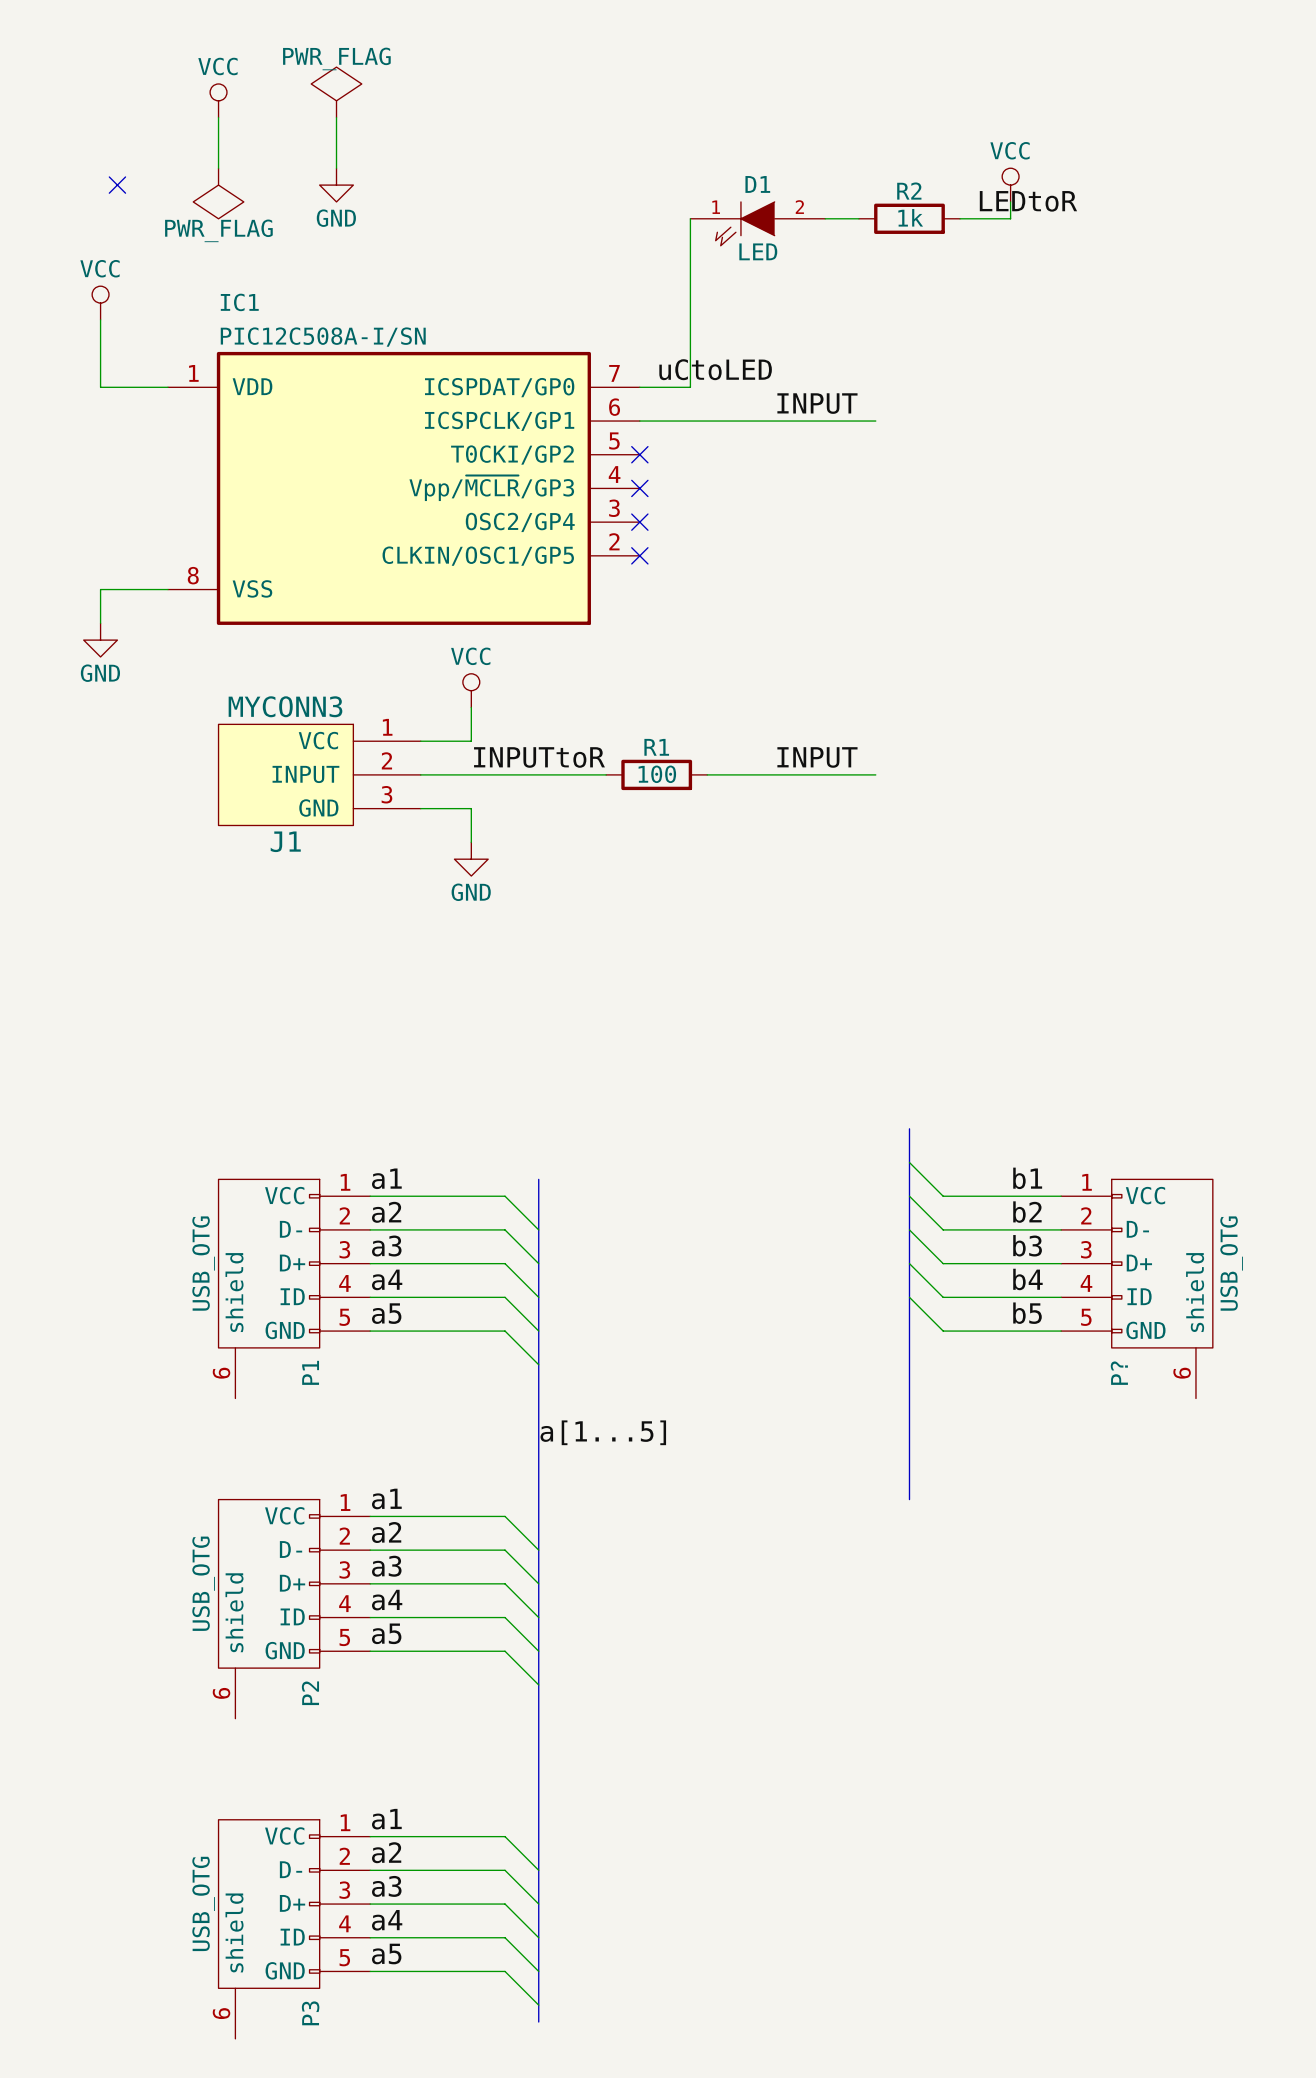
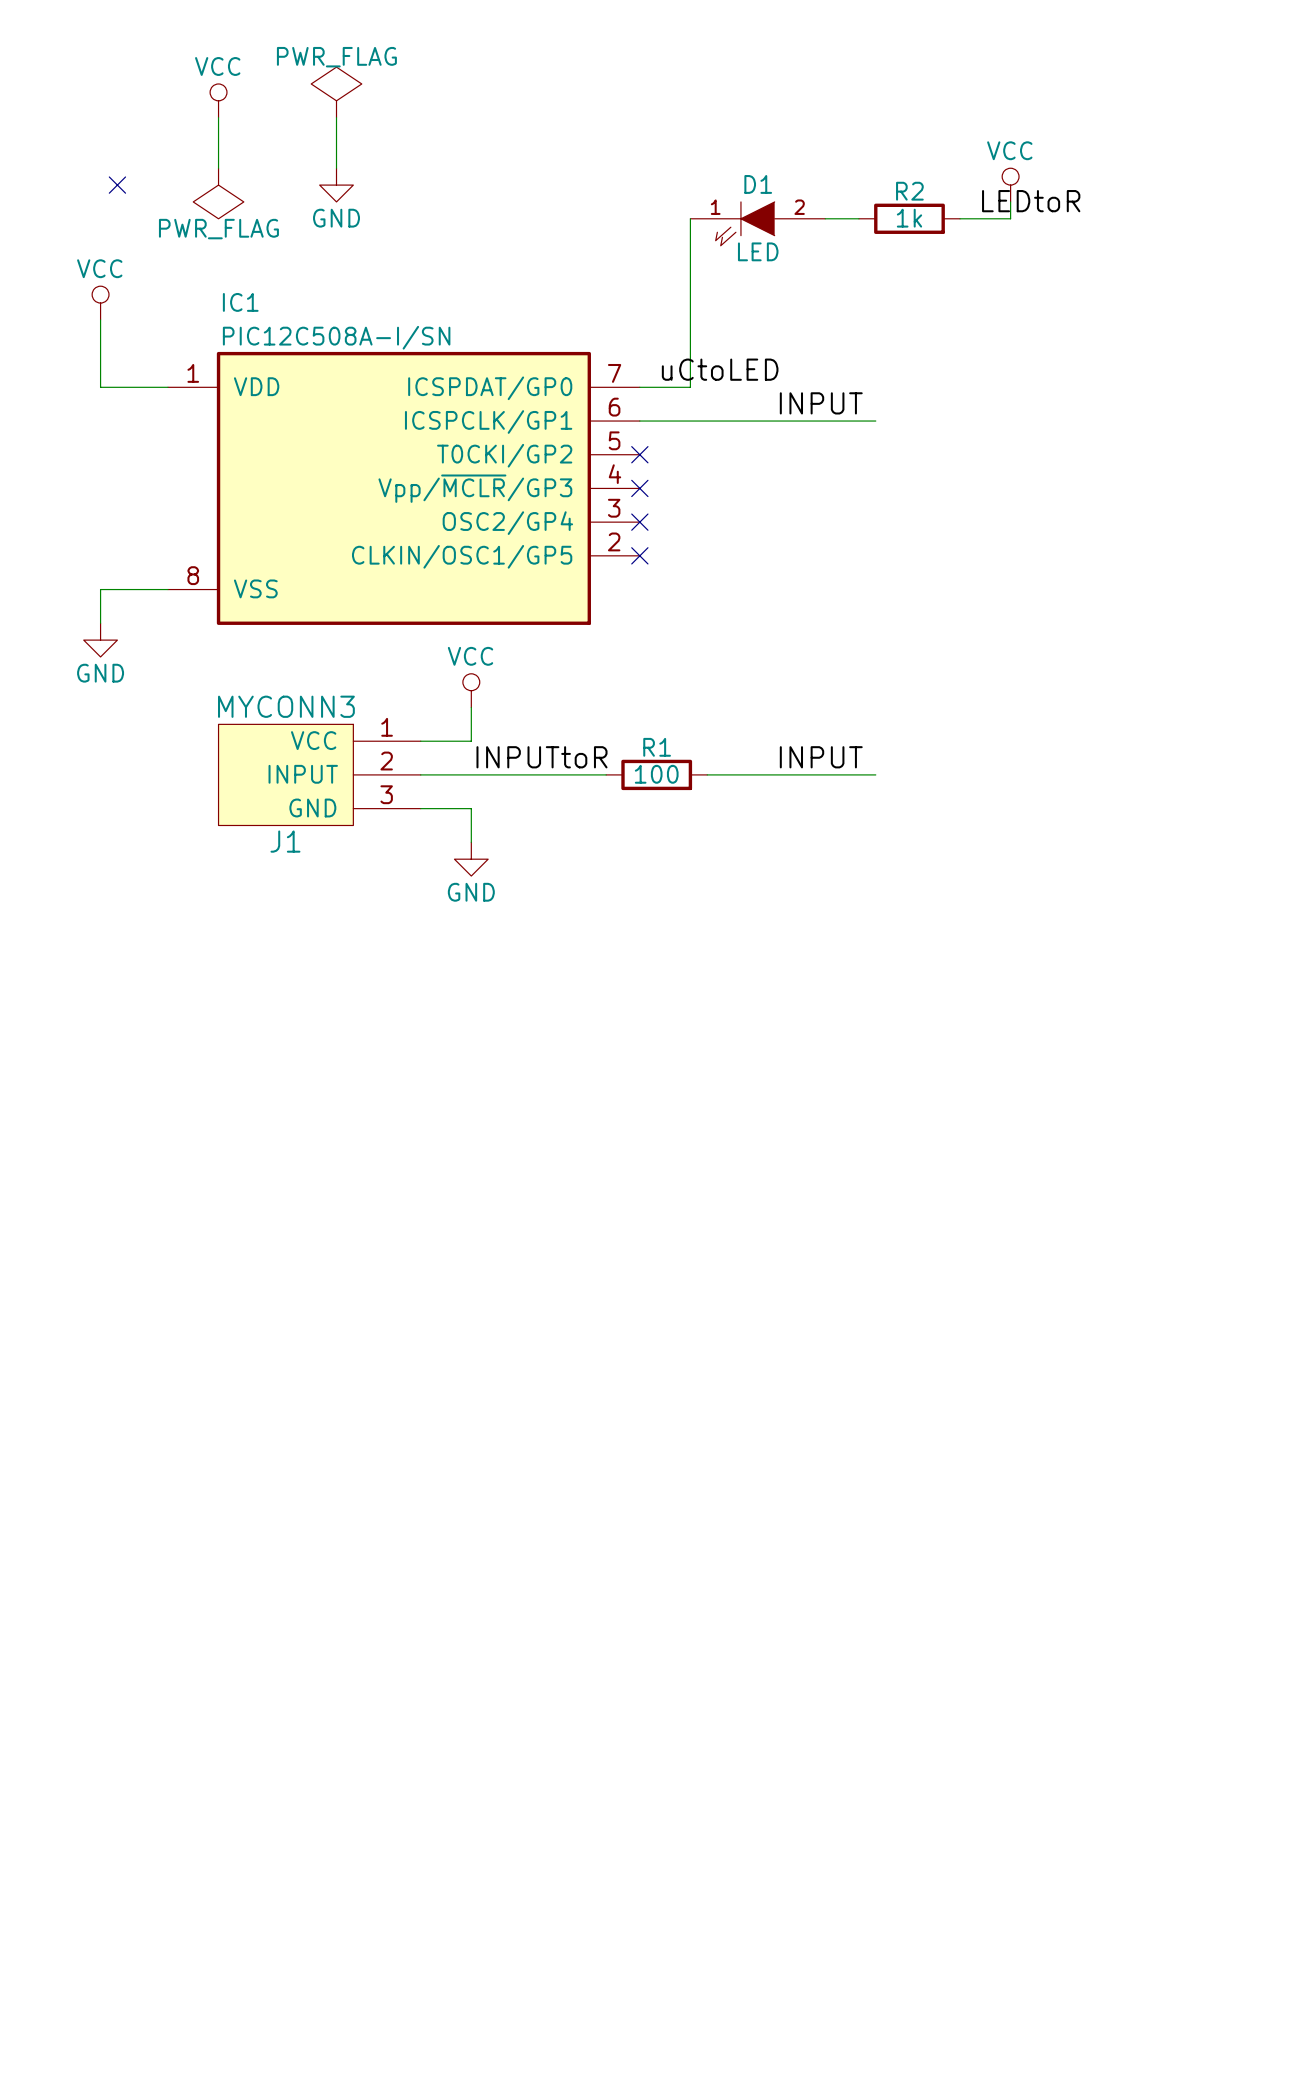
bus: (909, 1128) (909, 1499) -> none
wire: (909, 1162) (943, 1196) (1061, 1196) -> none
label: a1 (386, 1178) -> none
label: b1 (1027, 1178) -> none
bus: (538, 1179) (538, 2022) -> none
wire: (370, 1196) (505, 1196) (538, 1229) -> none
wire: (909, 1196) (943, 1229) (1061, 1229) -> none
label: a2 (386, 1212) -> none
label: b2 (1027, 1212) -> none
wire: (370, 1229) (505, 1229) (538, 1263) -> none
wire: (909, 1229) (943, 1263) (1061, 1263) -> none
label: b3 (1027, 1245) -> none
label: a3 (386, 1246) -> none
wire: (370, 1263) (505, 1263) (538, 1297) -> none
wire: (909, 1263) (943, 1297) (1061, 1297) -> none
label: a4 (387, 1279) -> none
label: b4 (1027, 1279) -> none
P1: USB_OTG (294, 1288) -> none
P?: USB_OTG (1137, 1288) -> none
wire: (370, 1297) (505, 1297) (538, 1331) -> none
wire: (909, 1297) (943, 1331) (1061, 1331) -> none
label: a5 (386, 1313) -> none
label: b5 (1027, 1313) -> none
wire: (370, 1331) (505, 1331) (538, 1364) -> none
label: a[1...5] (603, 1432) -> none
label: a1 (386, 1498) -> none
wire: (370, 1516) (505, 1516) (538, 1550) -> none
label: a2 (386, 1532) -> none
wire: (370, 1550) (505, 1550) (538, 1583) -> none
label: a3 (386, 1566) -> none
wire: (370, 1583) (505, 1583) (538, 1617) -> none
label: a4 (387, 1600) -> none
P2: USB_OTG (294, 1609) -> none
wire: (370, 1617) (505, 1617) (538, 1651) -> none
label: a5 (386, 1633) -> none
wire: (370, 1651) (505, 1651) (538, 1684) -> none
label: a1 (386, 1819) -> none
wire: (370, 1836) (505, 1836) (538, 1870) -> none
label: a2 (386, 1852) -> none
wire: (370, 1870) (505, 1870) (538, 1904) -> none
label: a3 (386, 1886) -> none
wire: (370, 1904) (505, 1904) (538, 1937) -> none
label: a4 (387, 1920) -> none
P3: USB_OTG (294, 1929) -> none
wire: (370, 1937) (505, 1937) (538, 1971) -> none
label: a5 (386, 1954) -> none
wire: (370, 1971) (505, 1971) (538, 2005) -> none

